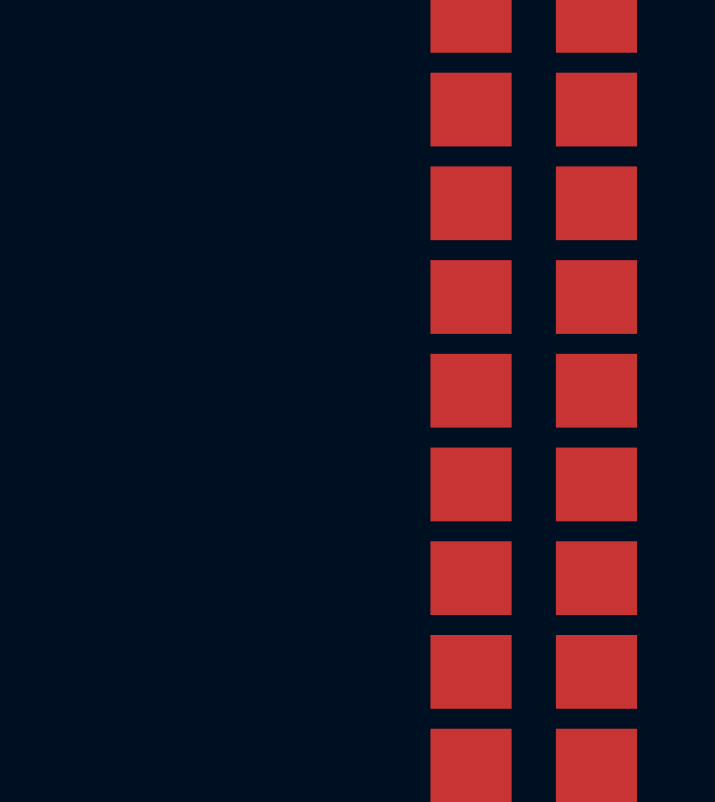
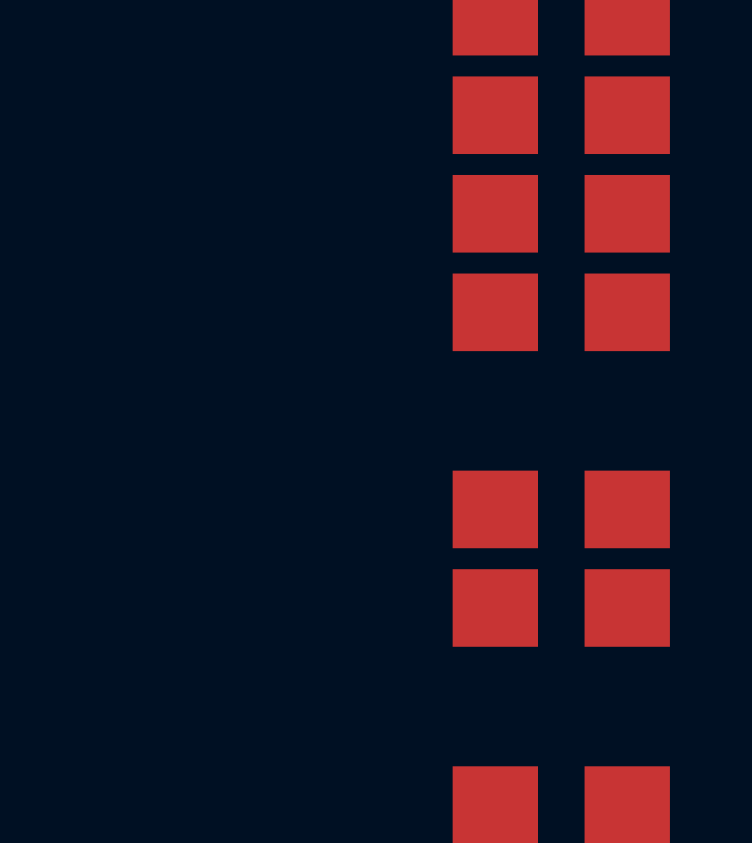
part: (533, 390) -> none
part: (533, 671) -> none

